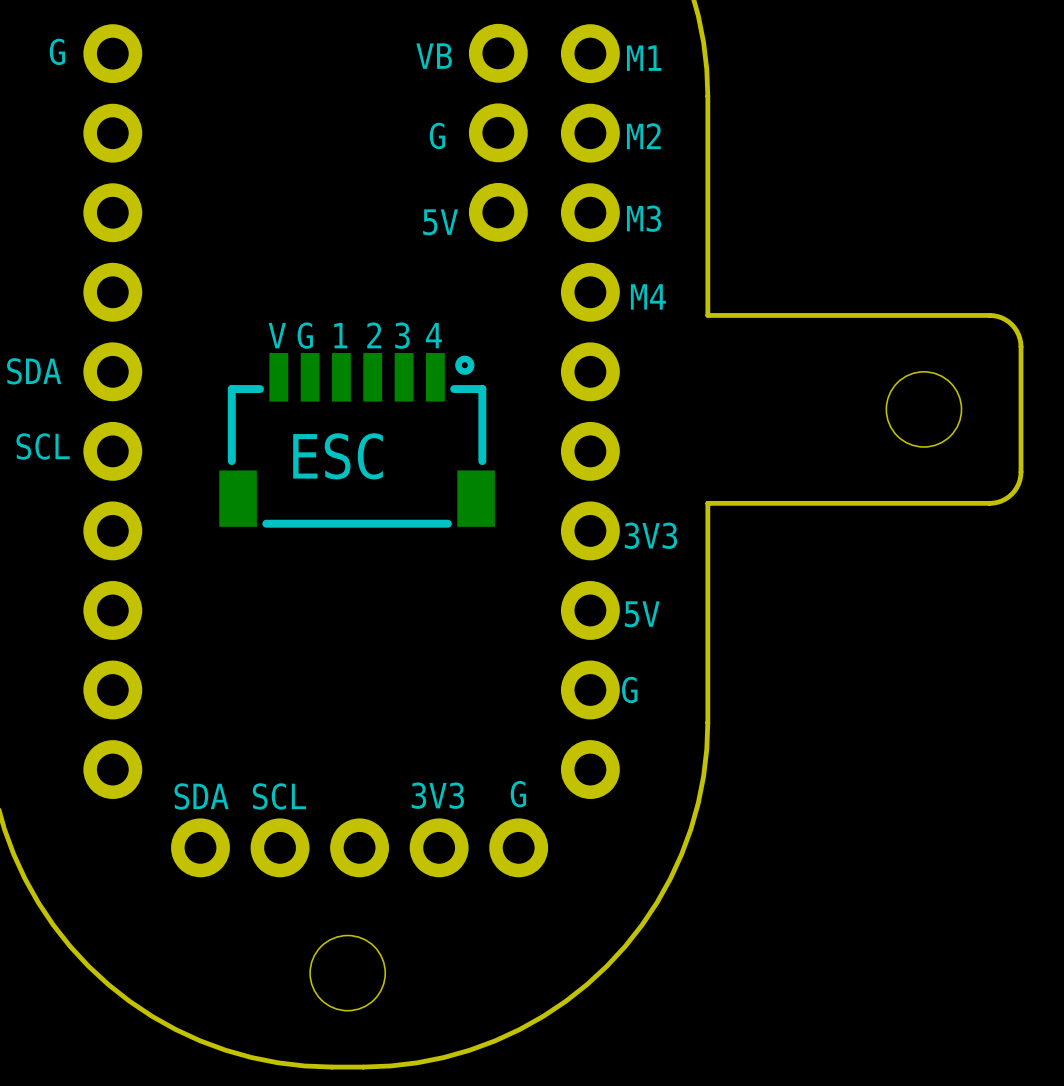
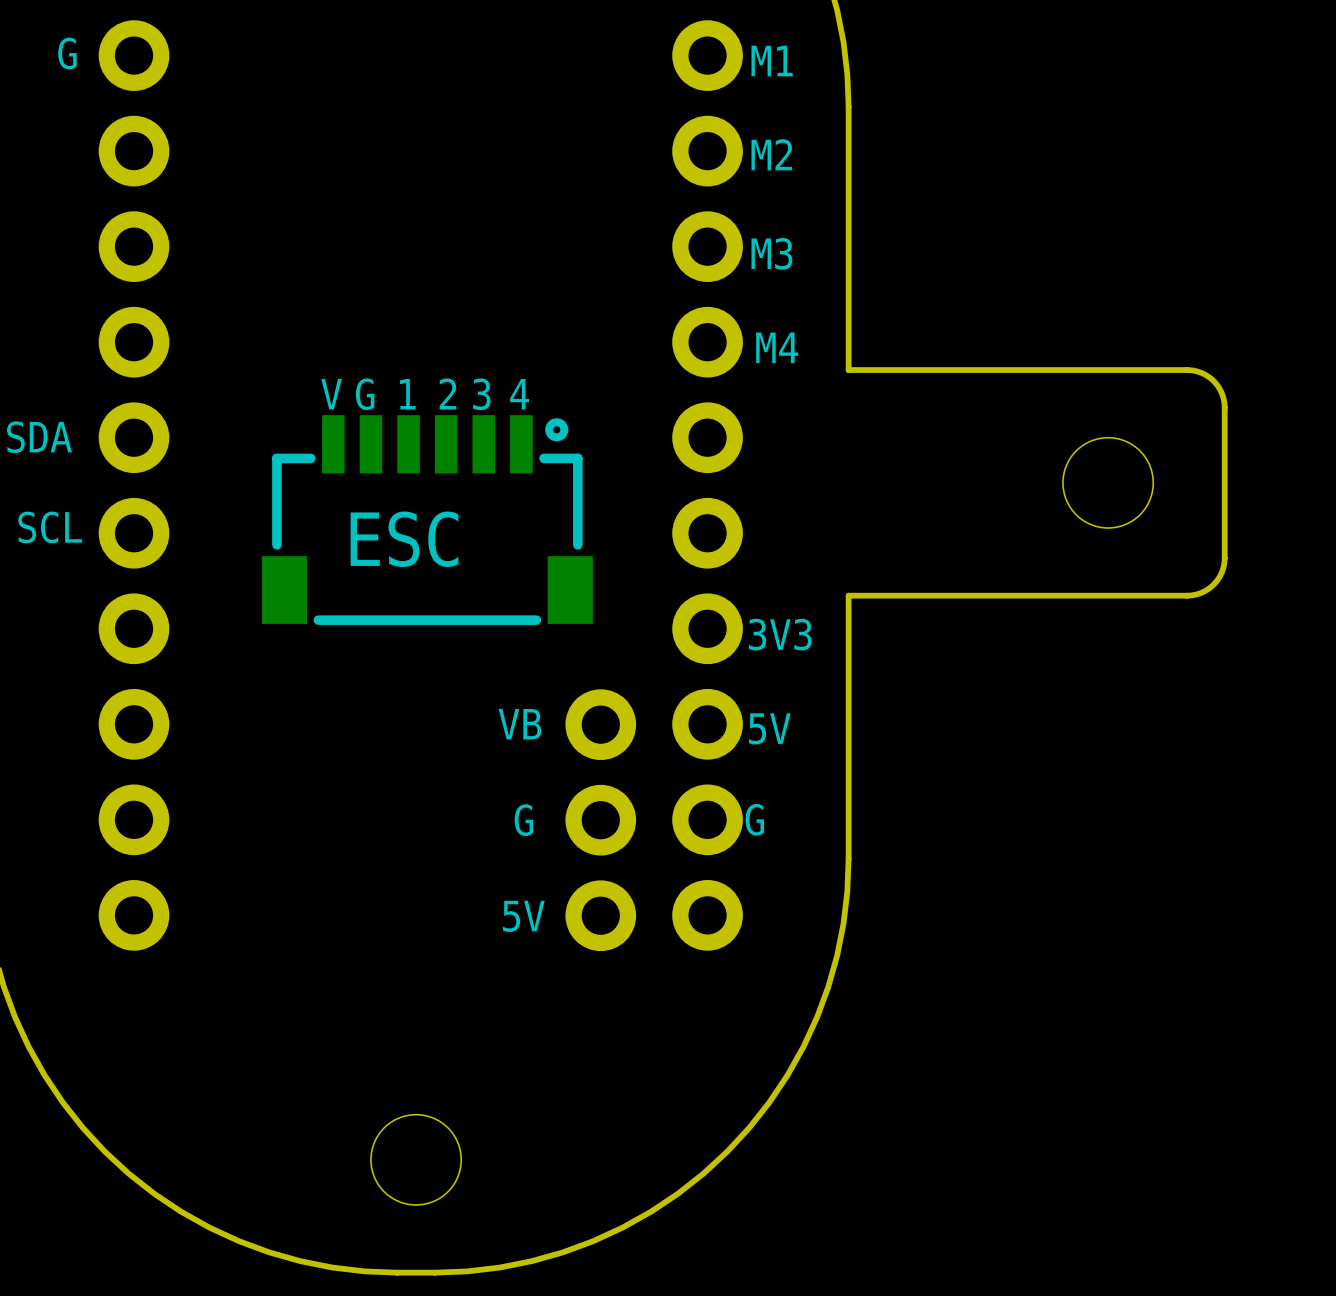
text position: VB (434, 56) -> VB (519, 724)
part position: (498, 132) -> (600, 820)
text: G (437, 135) -> none
text position: 5V (440, 222) -> 5V (523, 916)
text position: G (518, 794) -> G (523, 820)
text: 3V3 (437, 795) -> none
text: SDA (201, 796) -> none
text: SCL (279, 796) -> none
part: (359, 847) -> none

